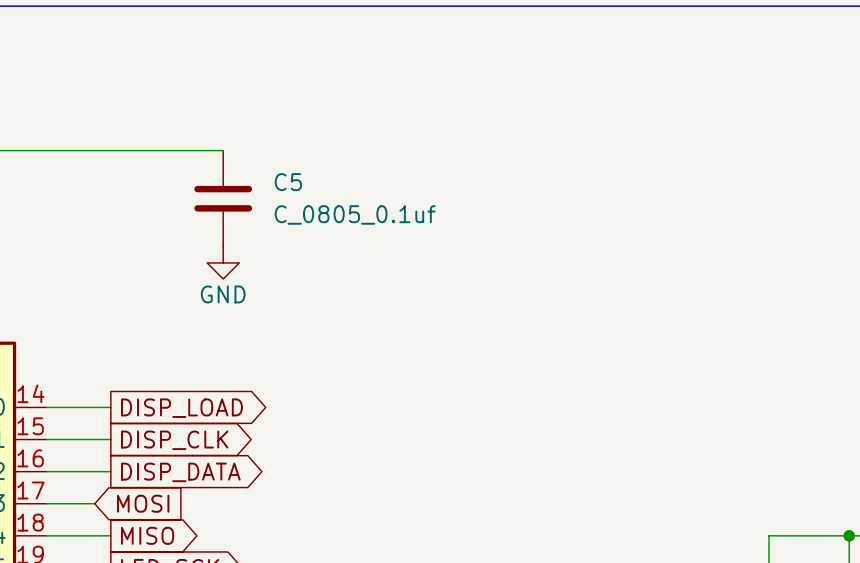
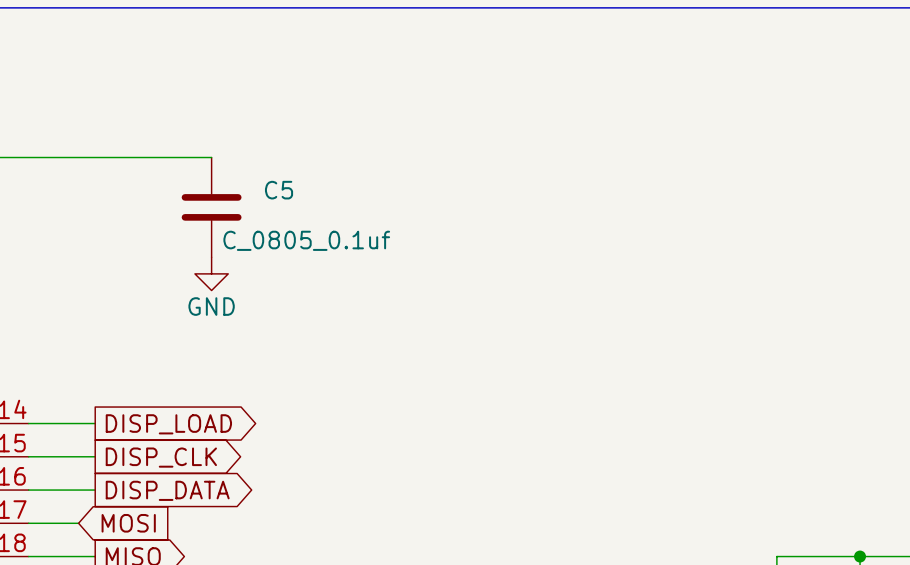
C5 value position: C_0805_0.1uf (355, 214) -> C_0805_0.1uf (306, 240)

